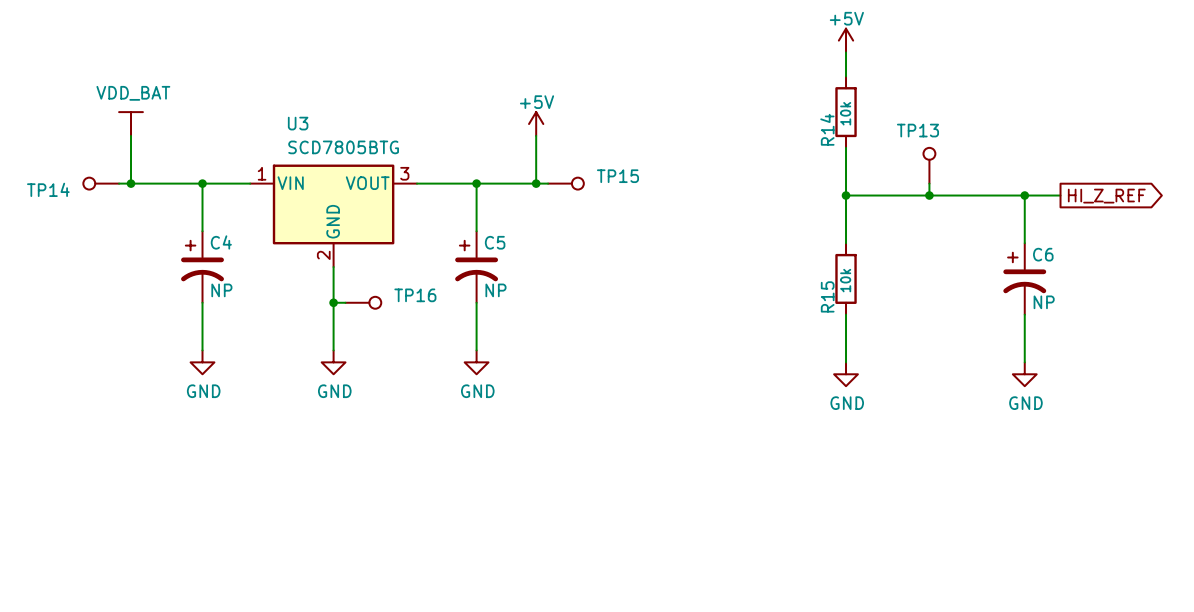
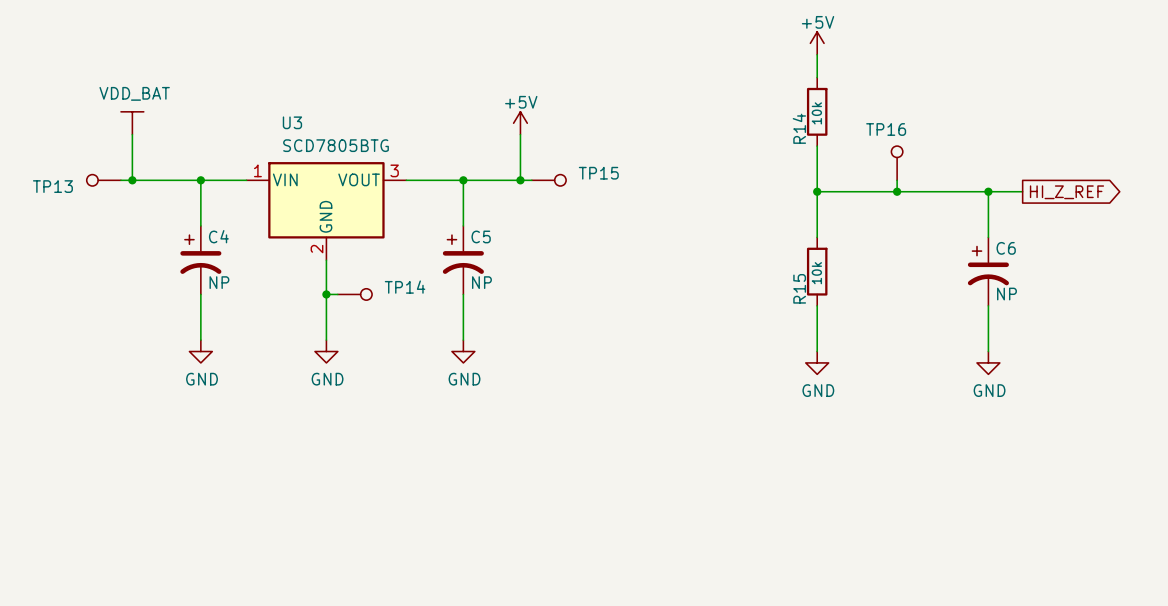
TP13 name: TP13 (917, 130) -> TP16 (886, 129)
TP14 name: TP14 (48, 189) -> TP13 (52, 186)
TP16 name: TP16 (415, 295) -> TP14 (405, 287)

